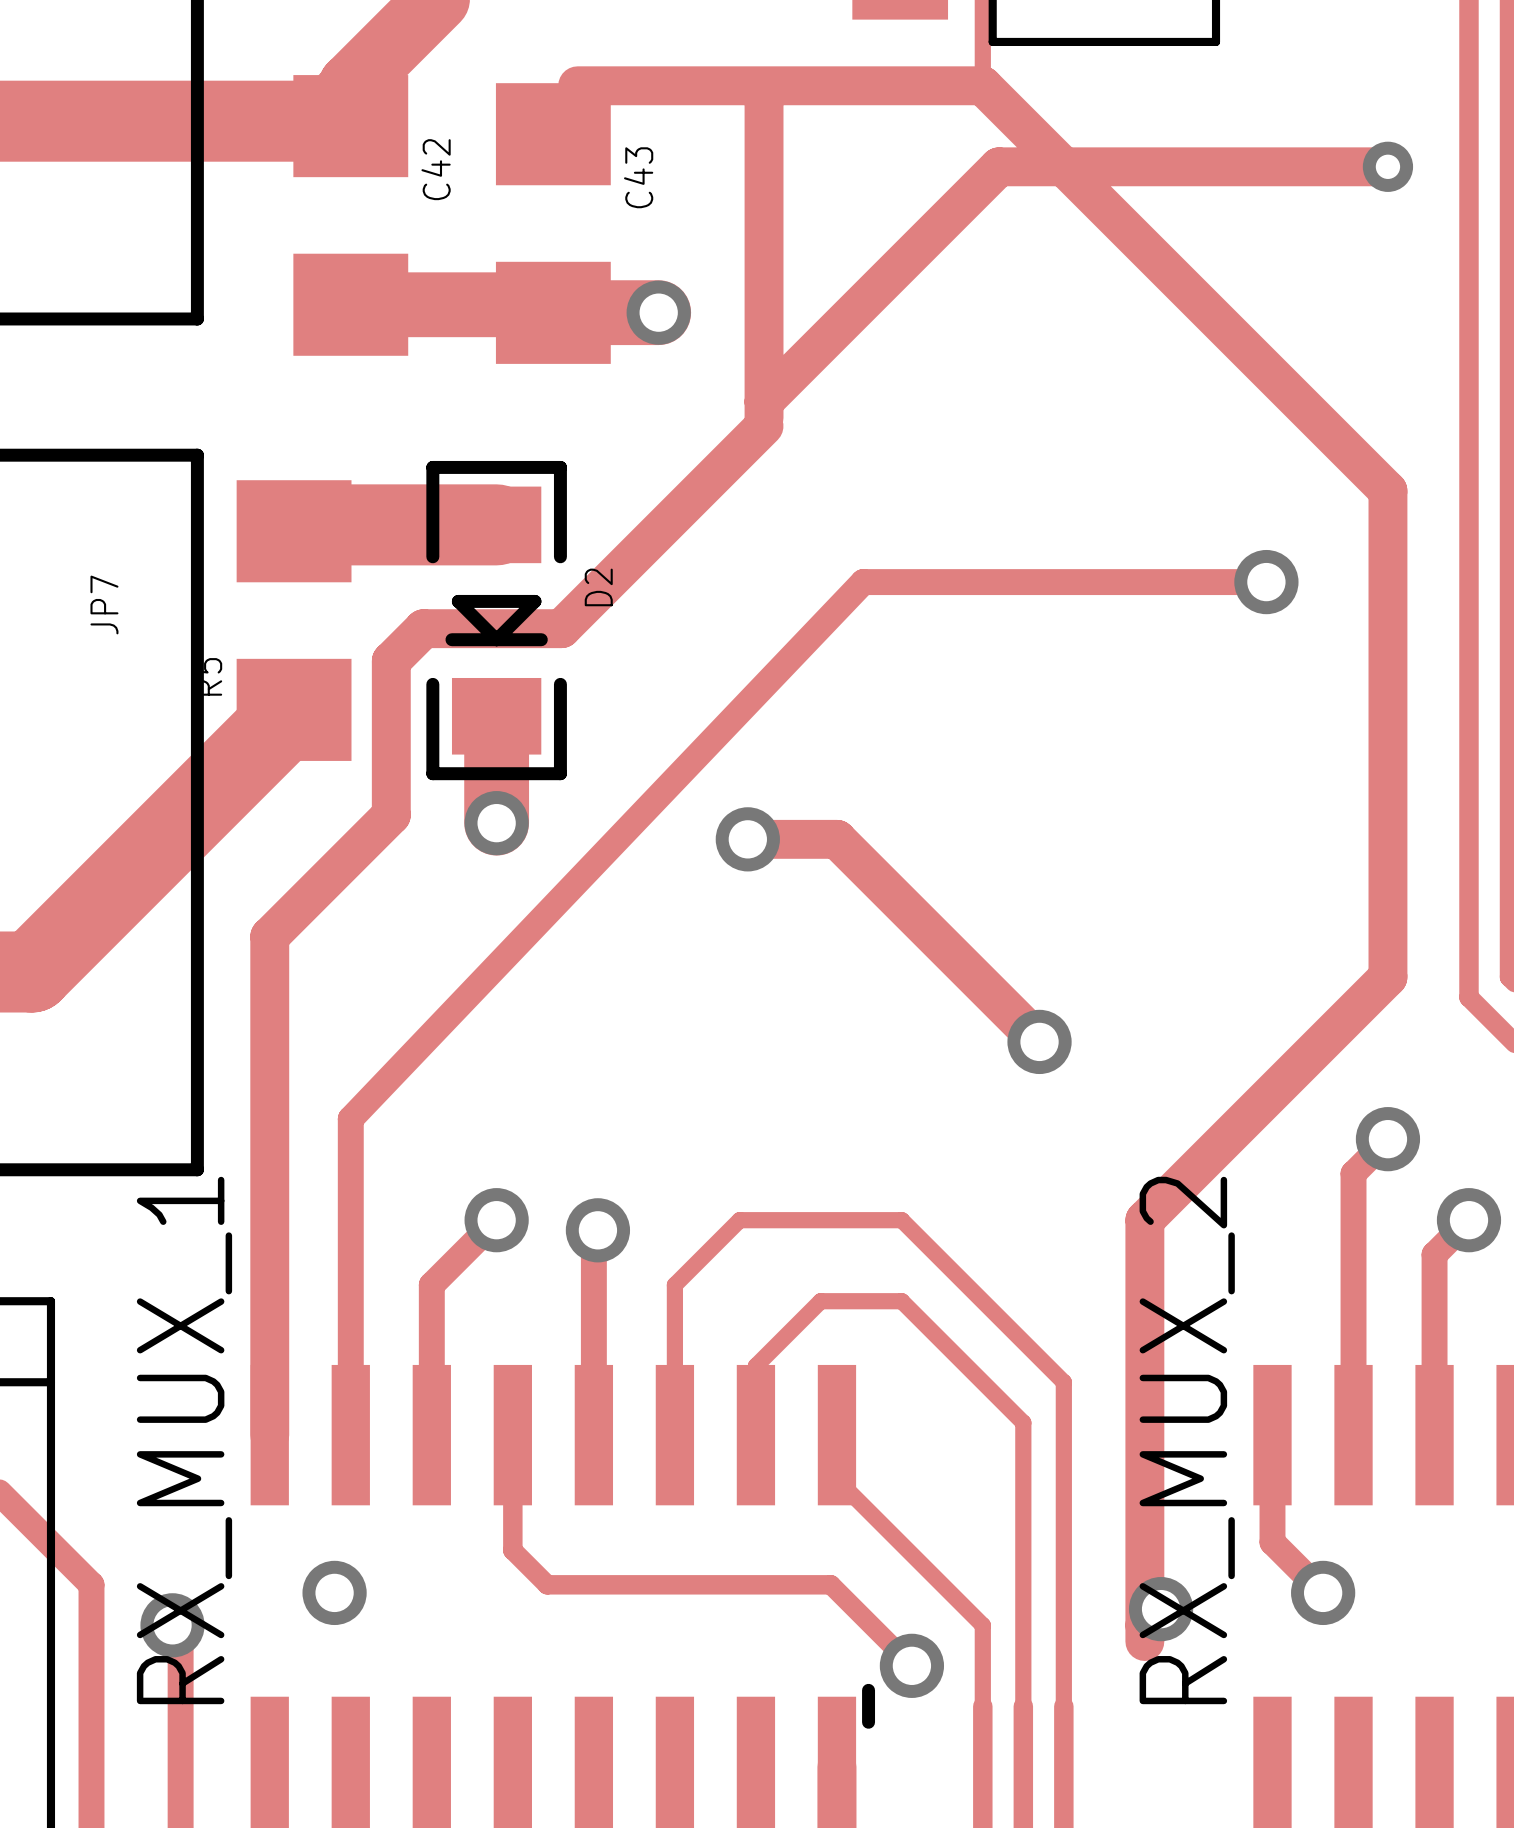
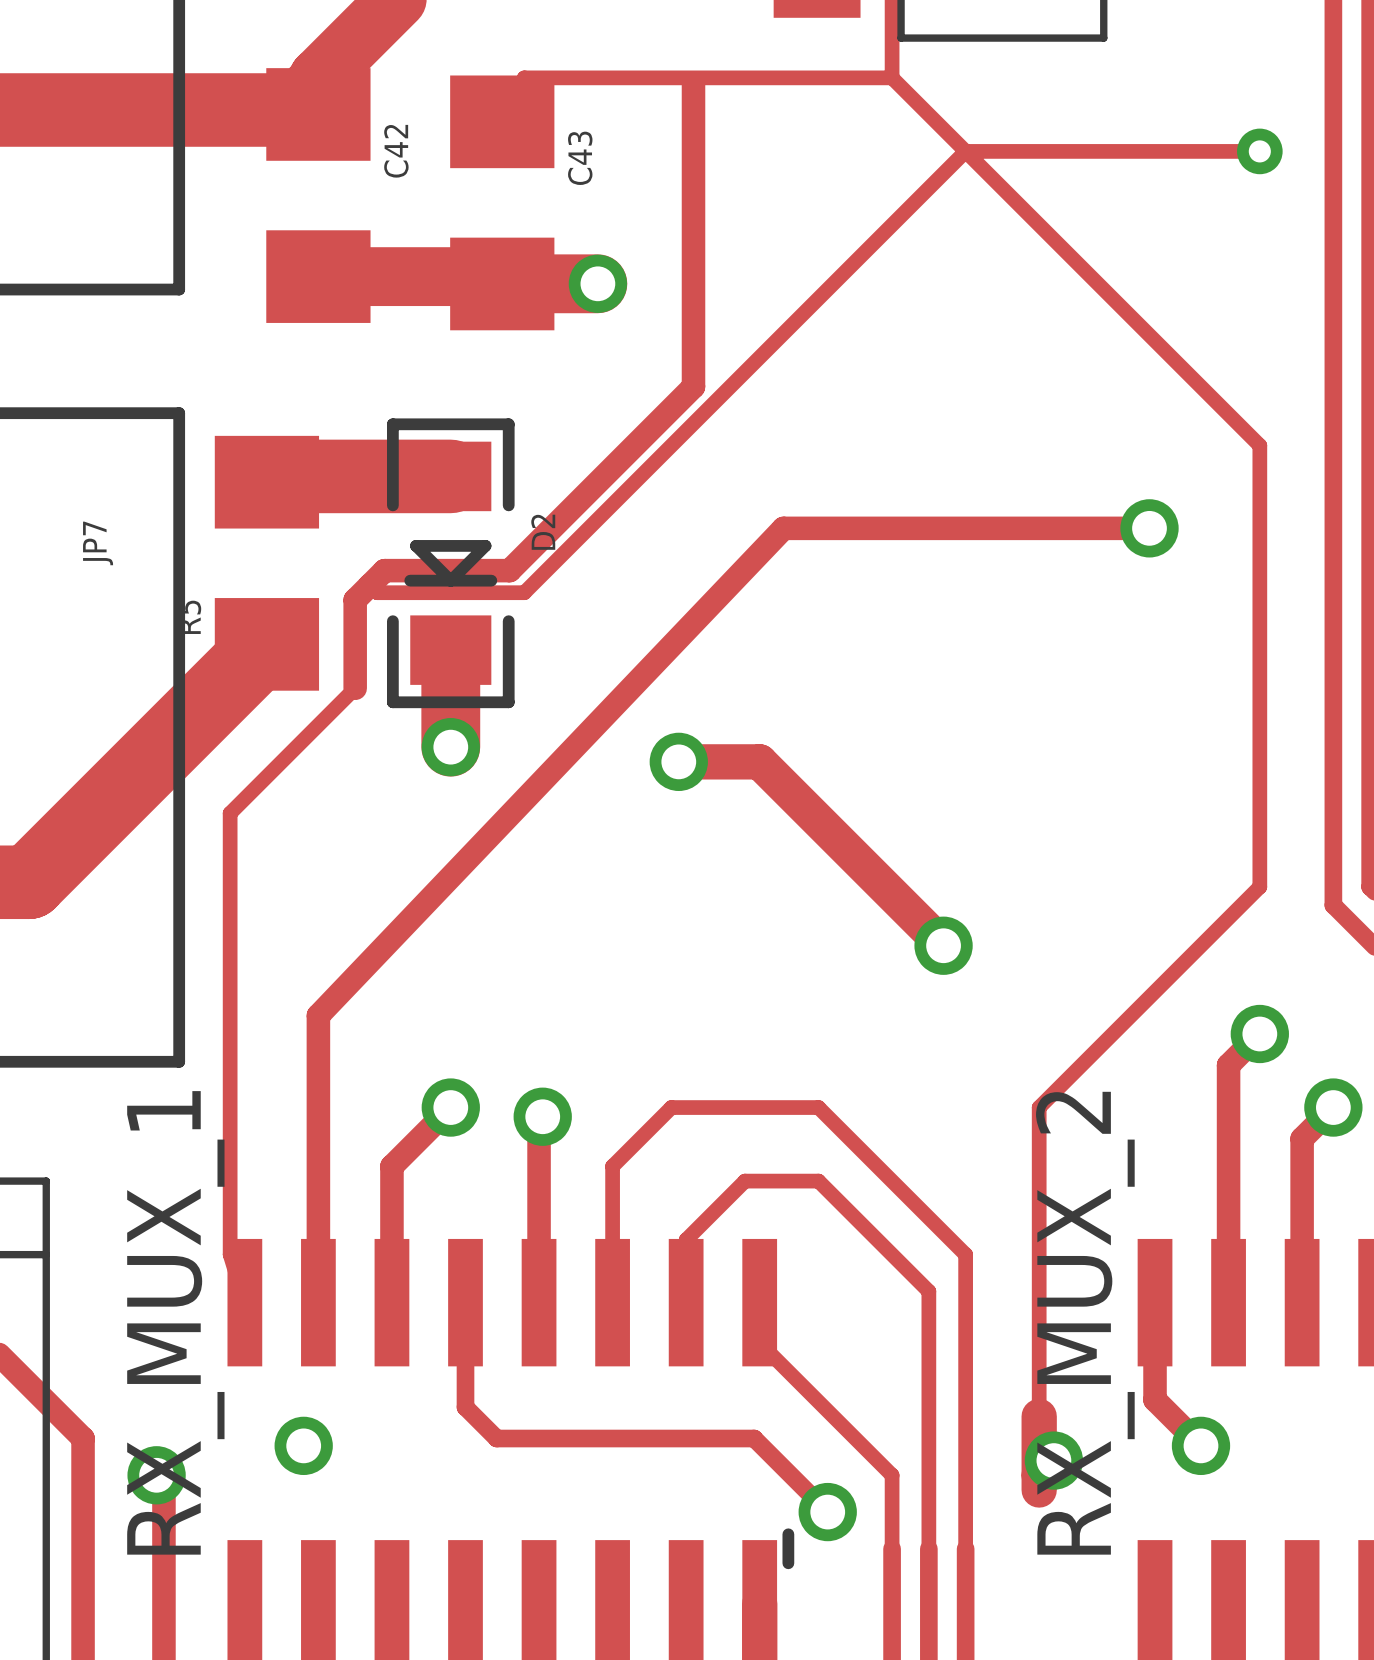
track width: thick (577, 85) (982, 85) (1387, 490) (1387, 977) (1144, 1220) (1144, 1560) -> thin (524, 77) (892, 77) (1259, 445) (1259, 886) (1039, 1107) (1039, 1416)
track width: thick (764, 93) (764, 418) -> thin (693, 85) (693, 379)
track: (1063, 166) (999, 166) (764, 401) -> (965, 151) (524, 592) (377, 592) (369, 585)
track width: thick (1063, 166) (1387, 166) -> thin (965, 151) (1259, 151)
track width: thick (764, 426) (561, 628) (423, 628) (391, 661) (391, 758) -> thin (693, 386) (509, 570) (384, 570) (355, 600) (355, 688)
track: (391, 758) (391, 815) (269, 936) (269, 1435) -> (355, 688) (230, 813) (230, 1254) (244, 1302)

